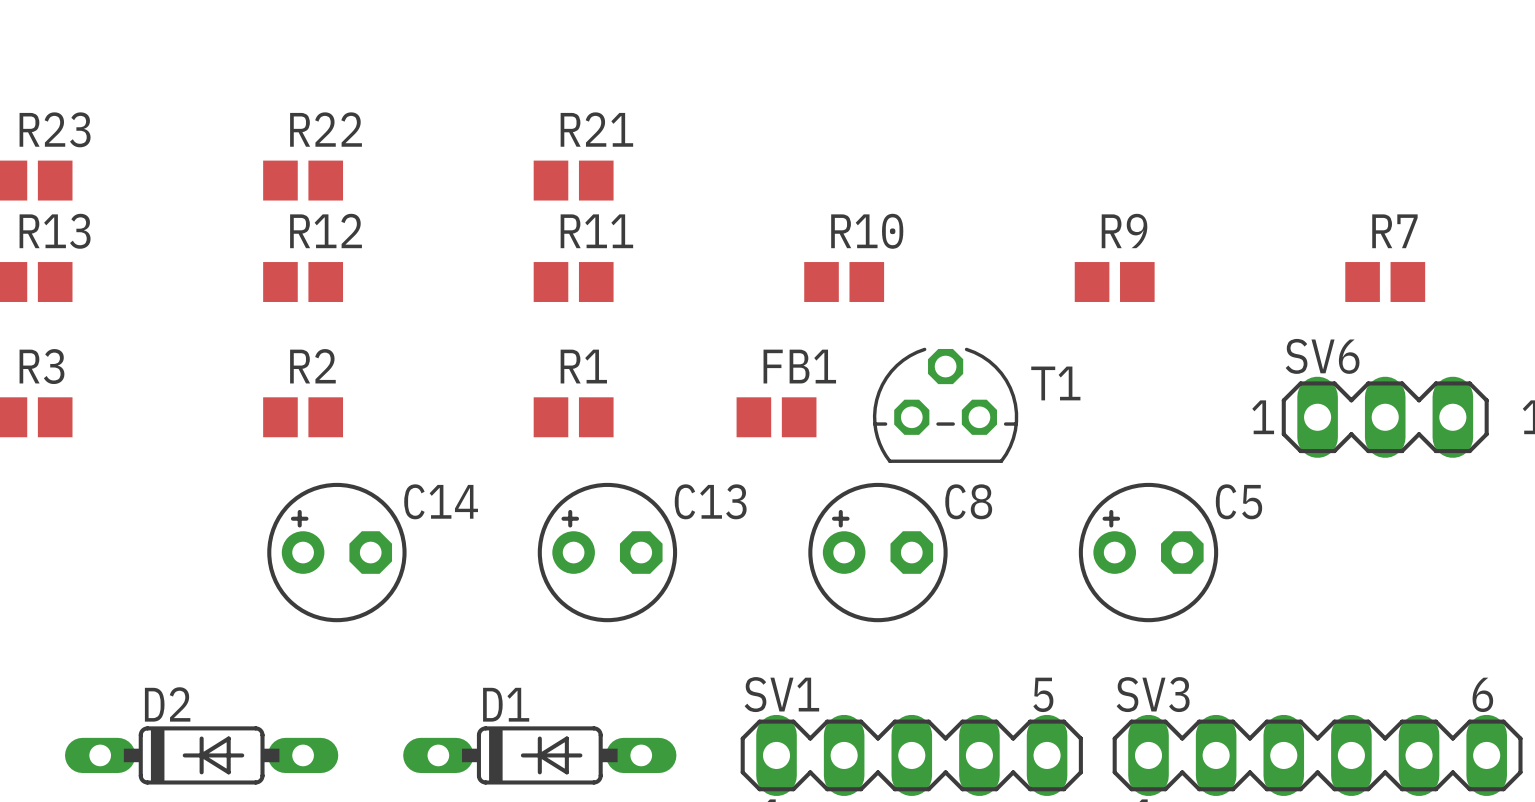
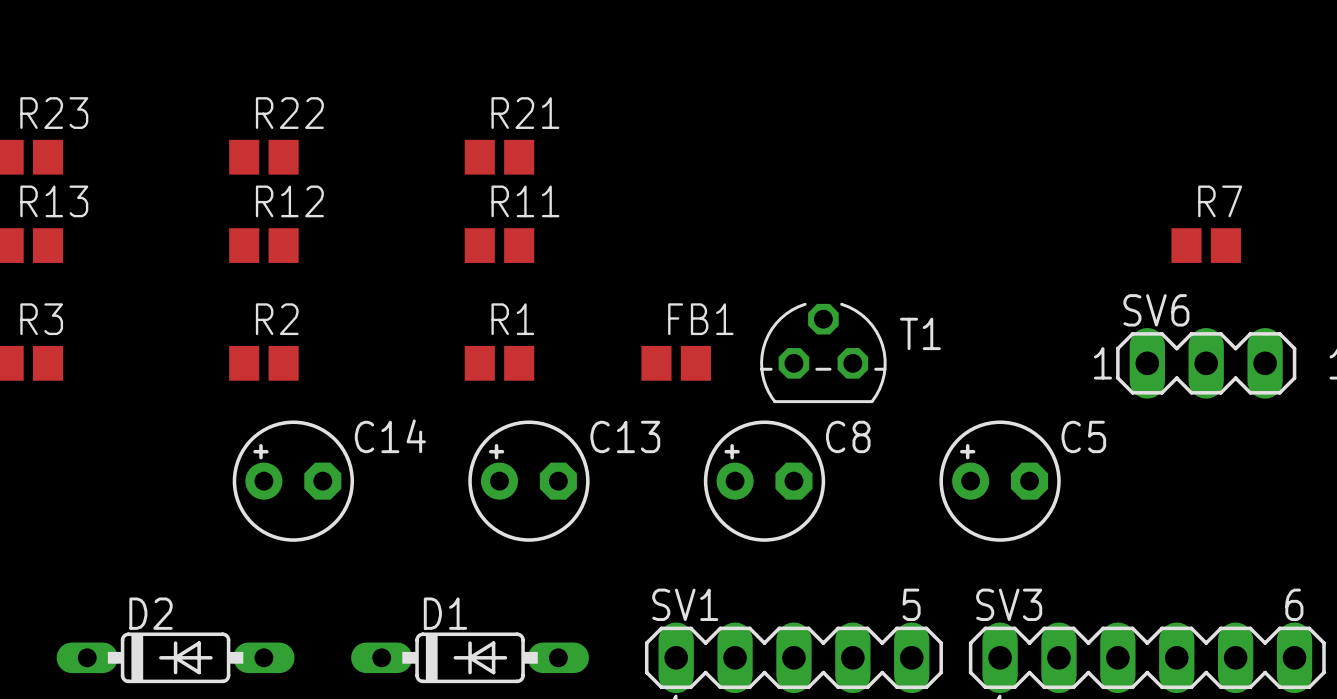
R10: (844, 282) -> none
R9: (1114, 282) -> none

